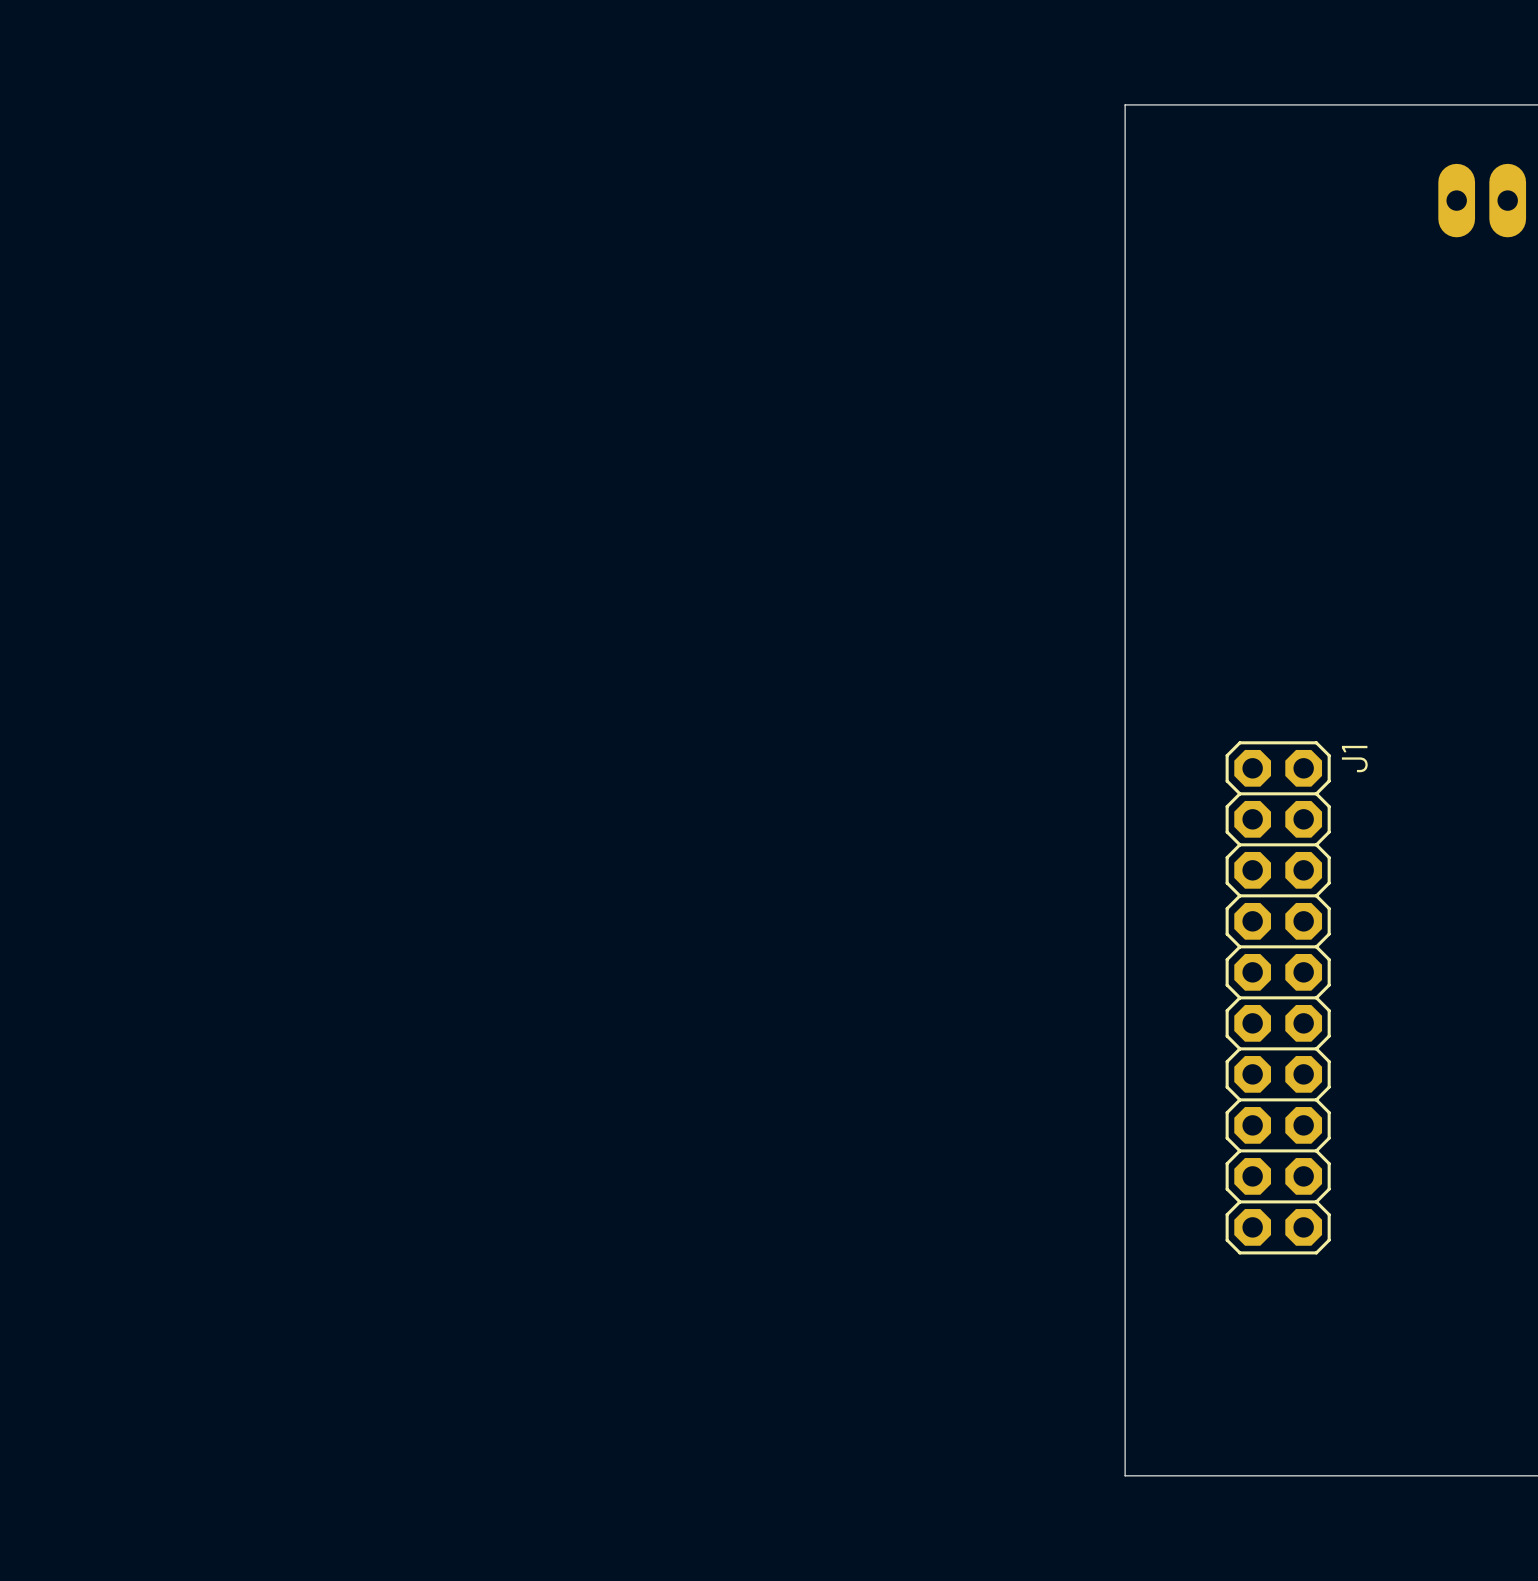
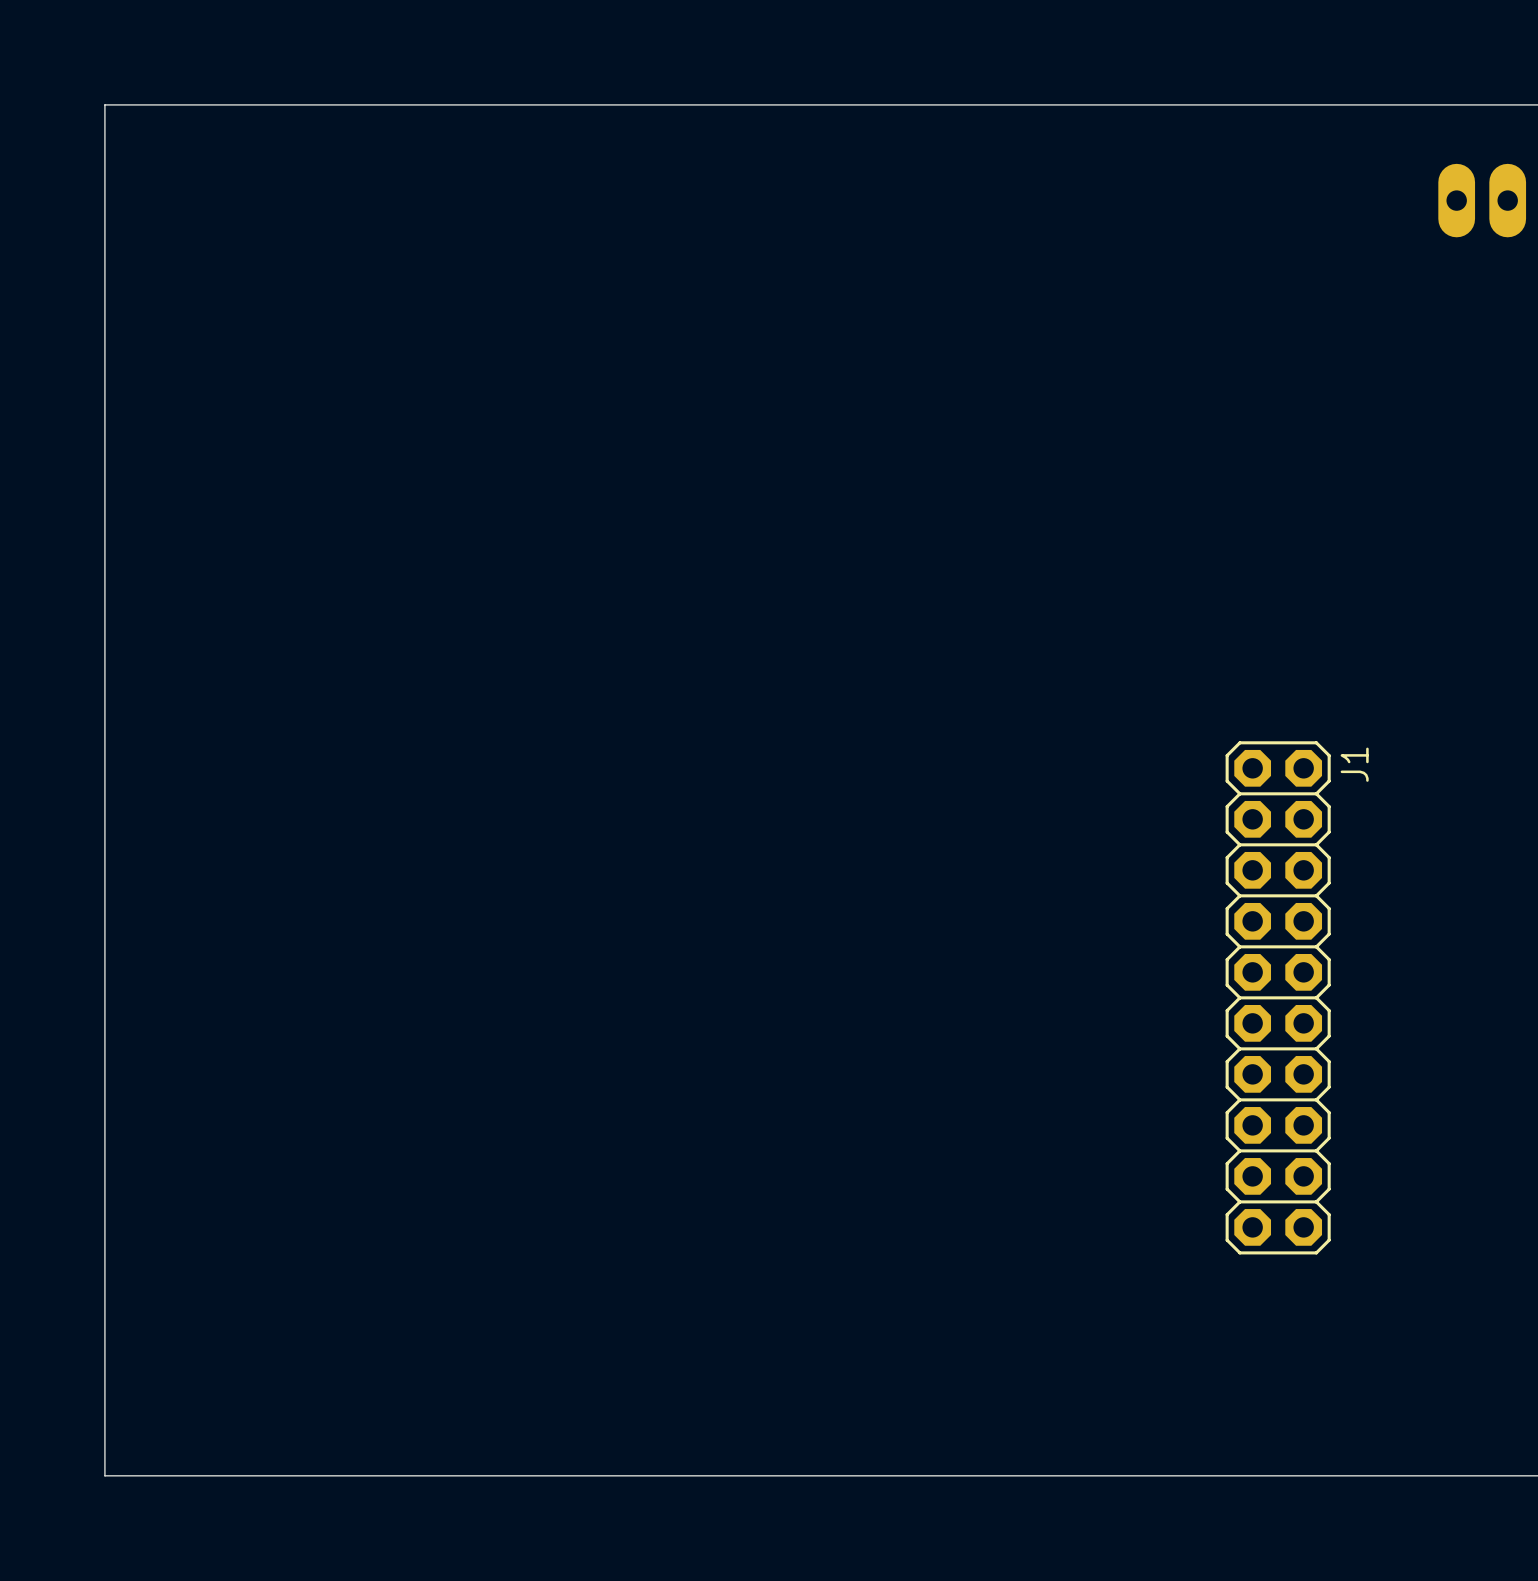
board edge: (1125, 104) (1125, 1475) -> (1125, 104) (104, 104) (104, 1475) (1125, 1475)

